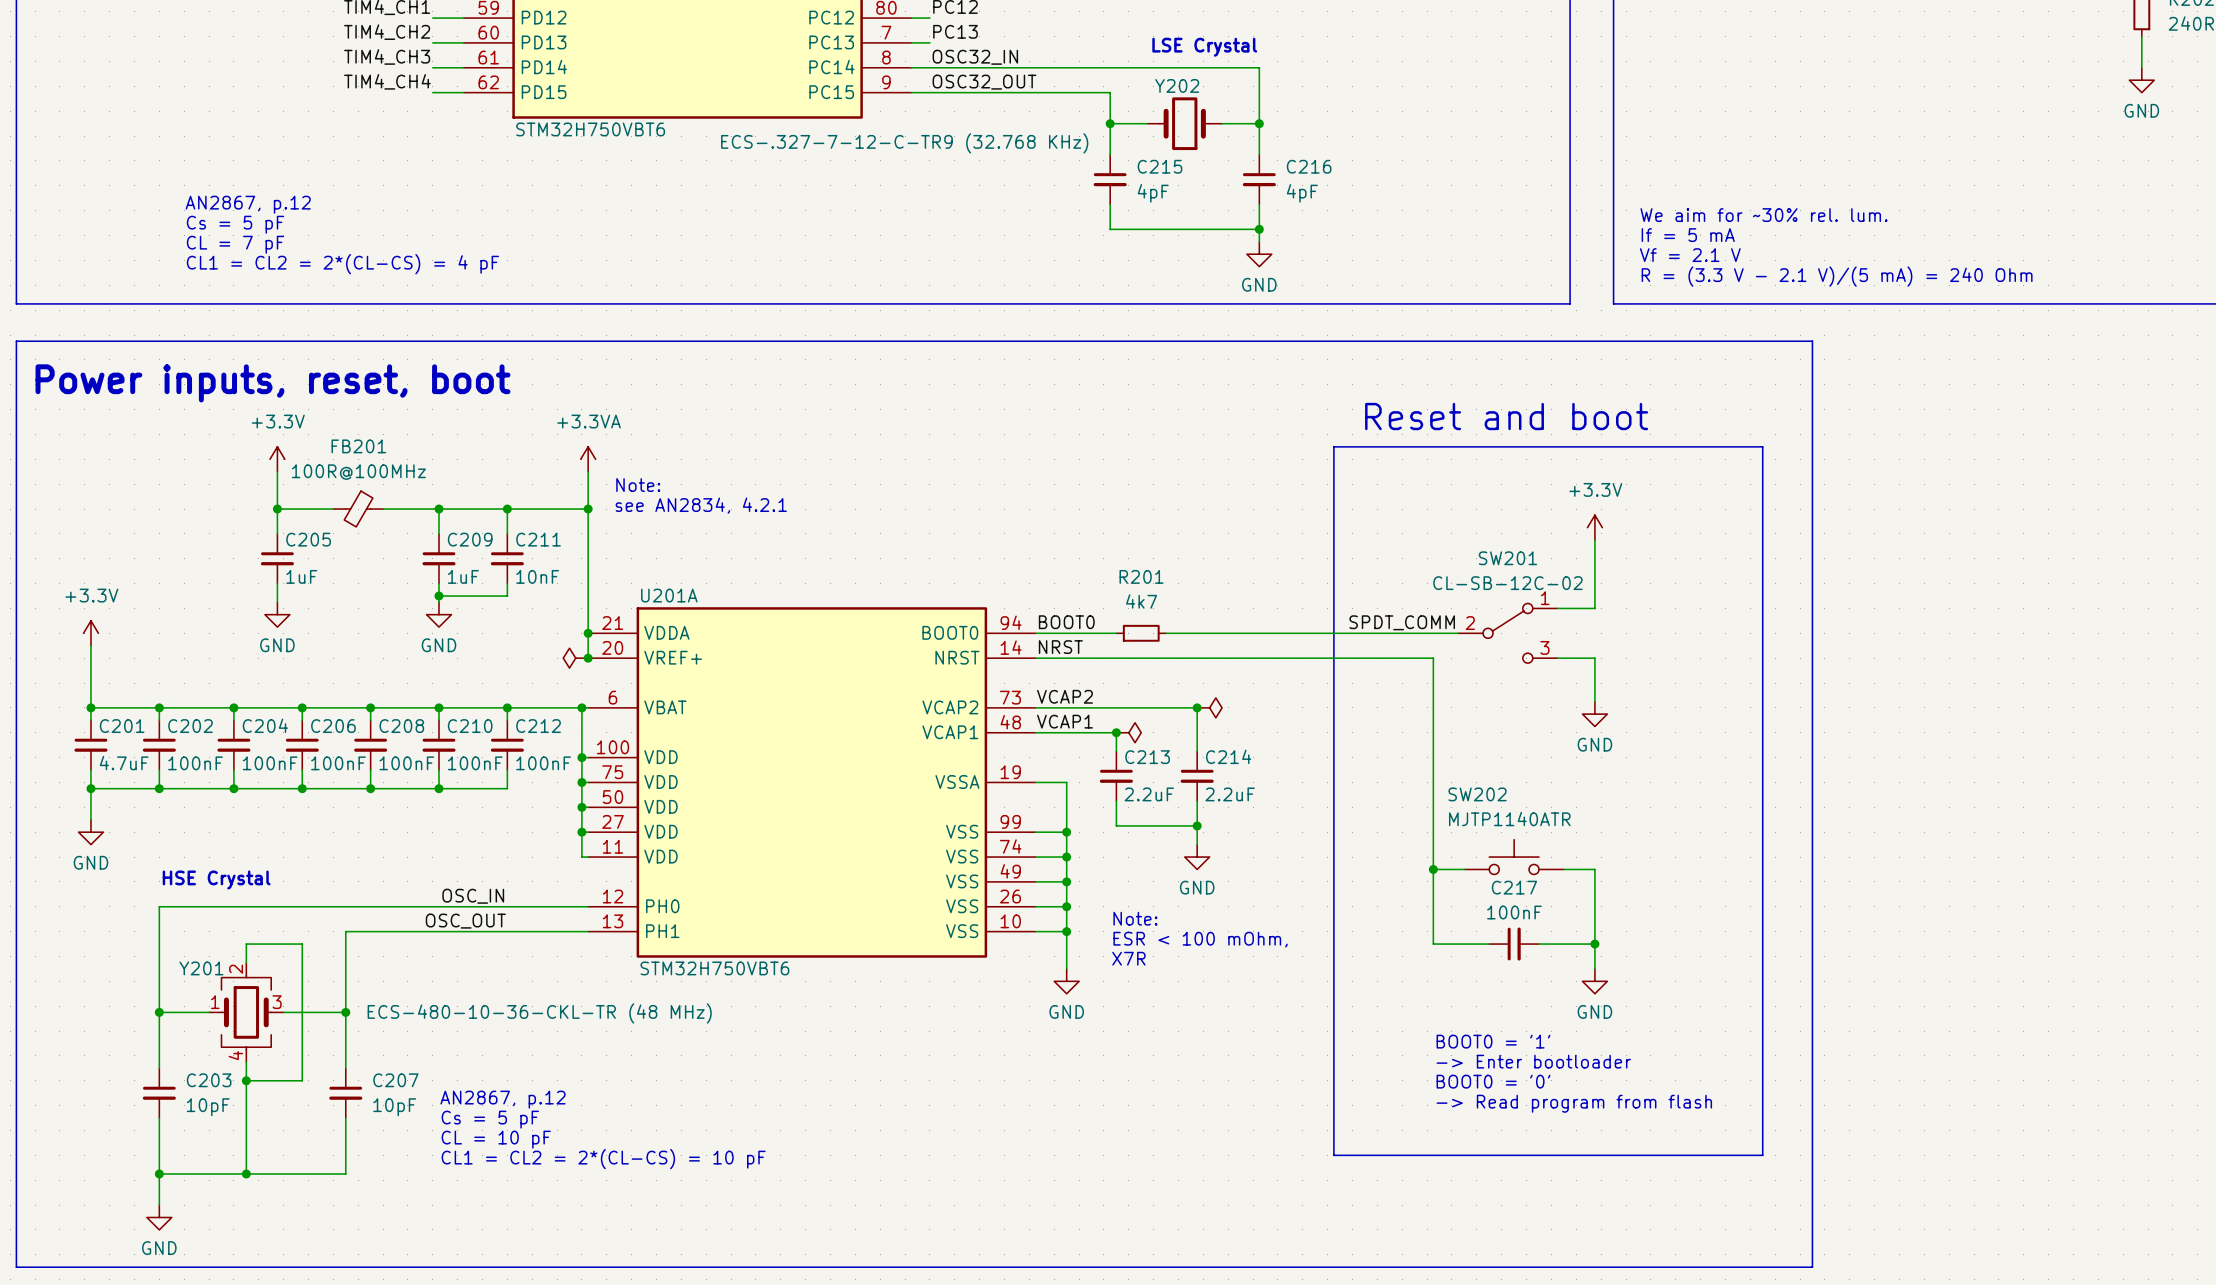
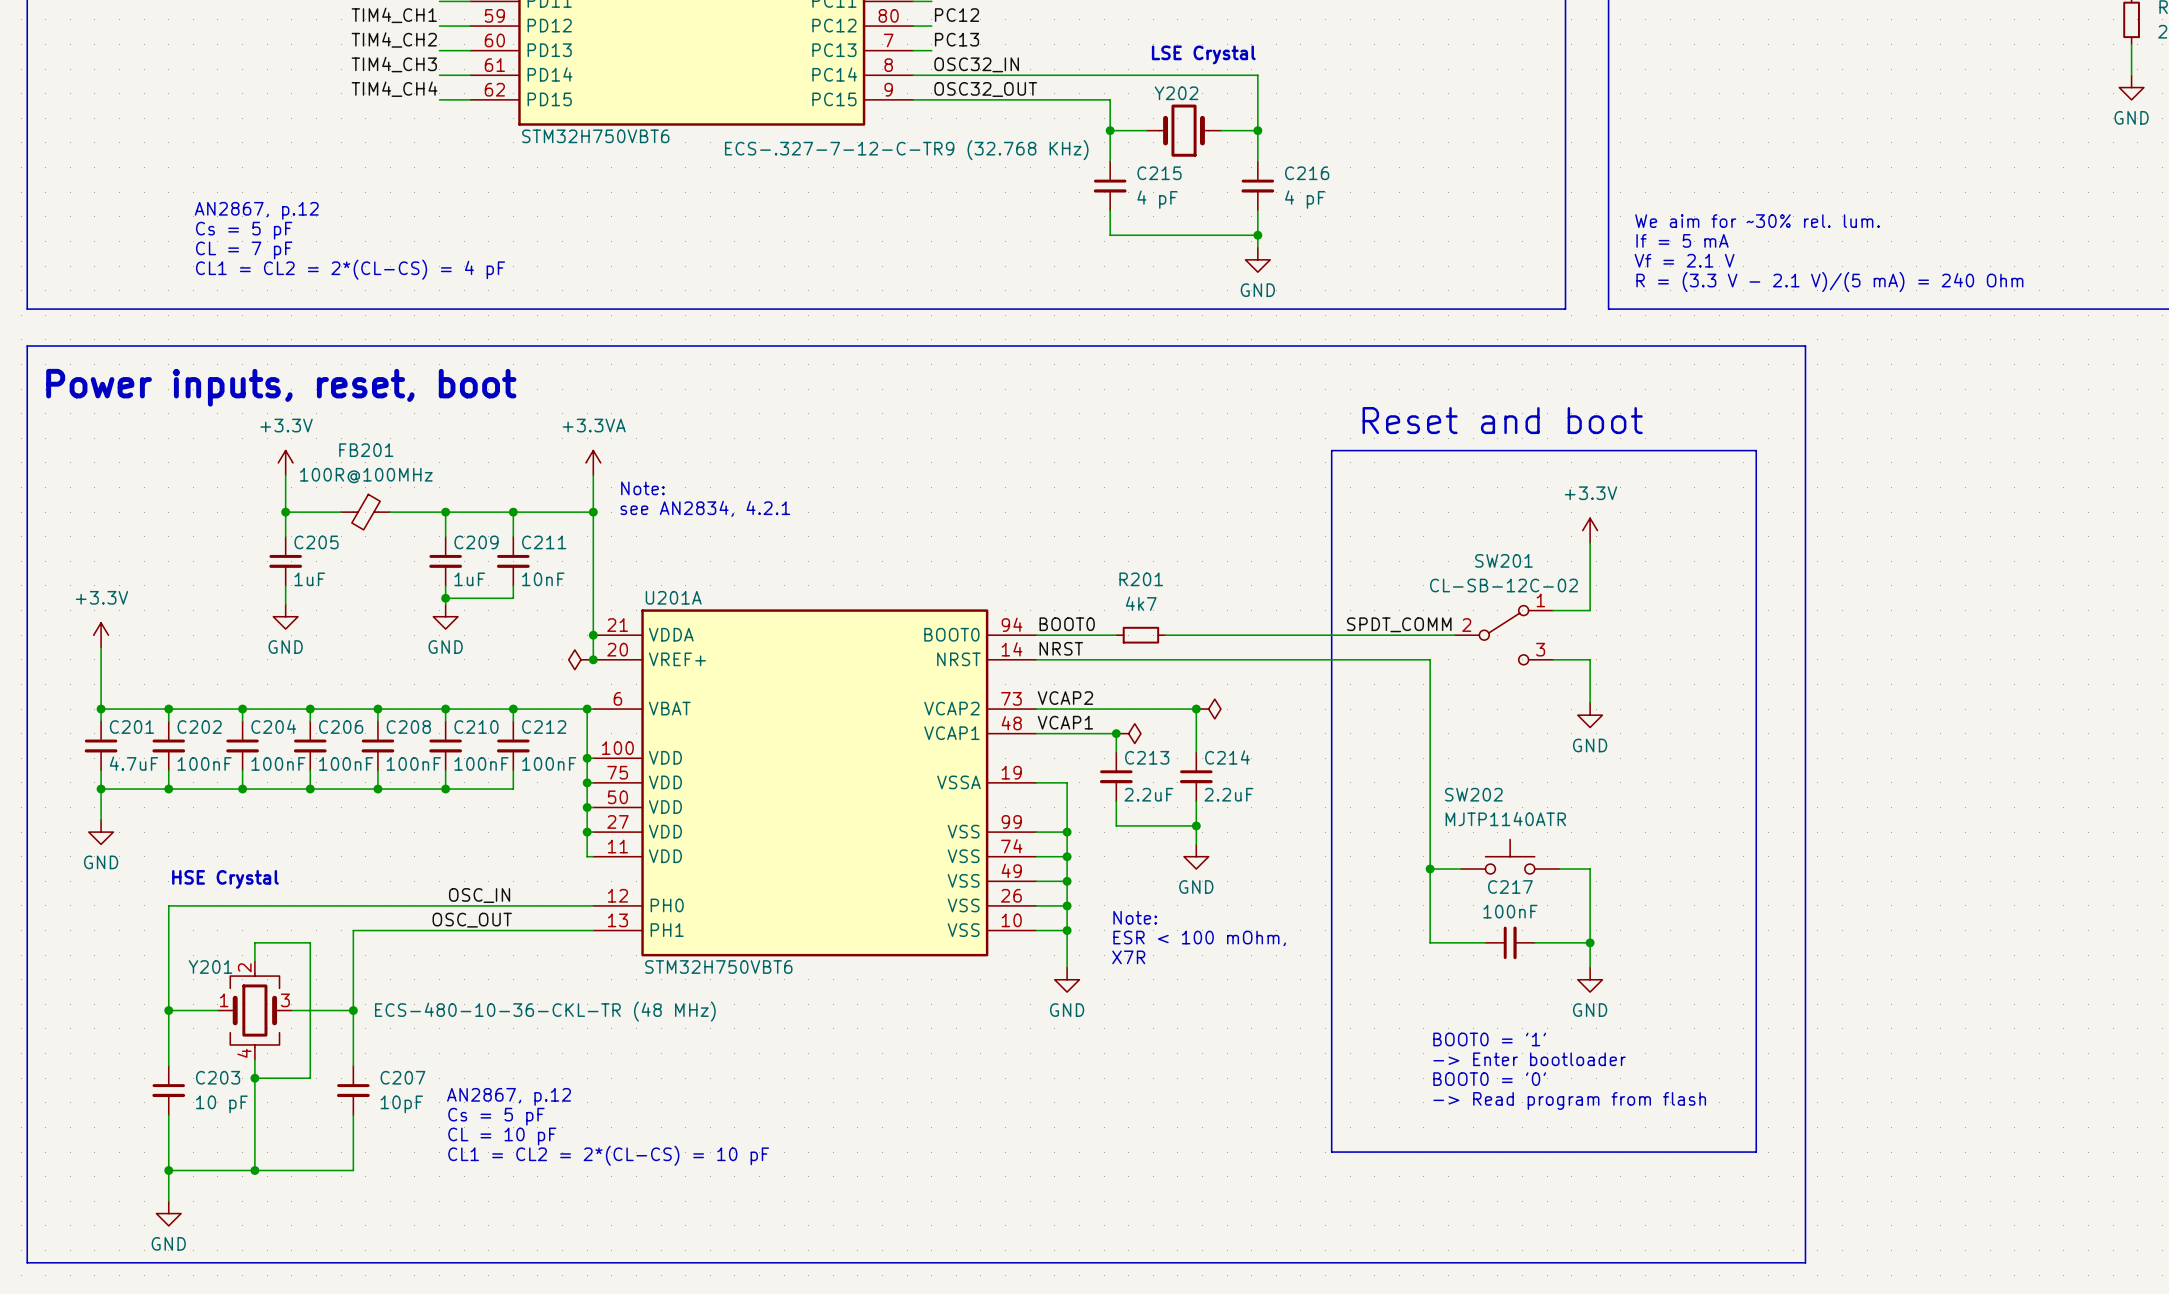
C215 value: 4pF (1153, 193) -> 4 pF (1157, 199)
C216 value: 4pF (1302, 193) -> 4 pF (1305, 199)
C203 value: 10pF (208, 1107) -> 10 pF (221, 1104)

